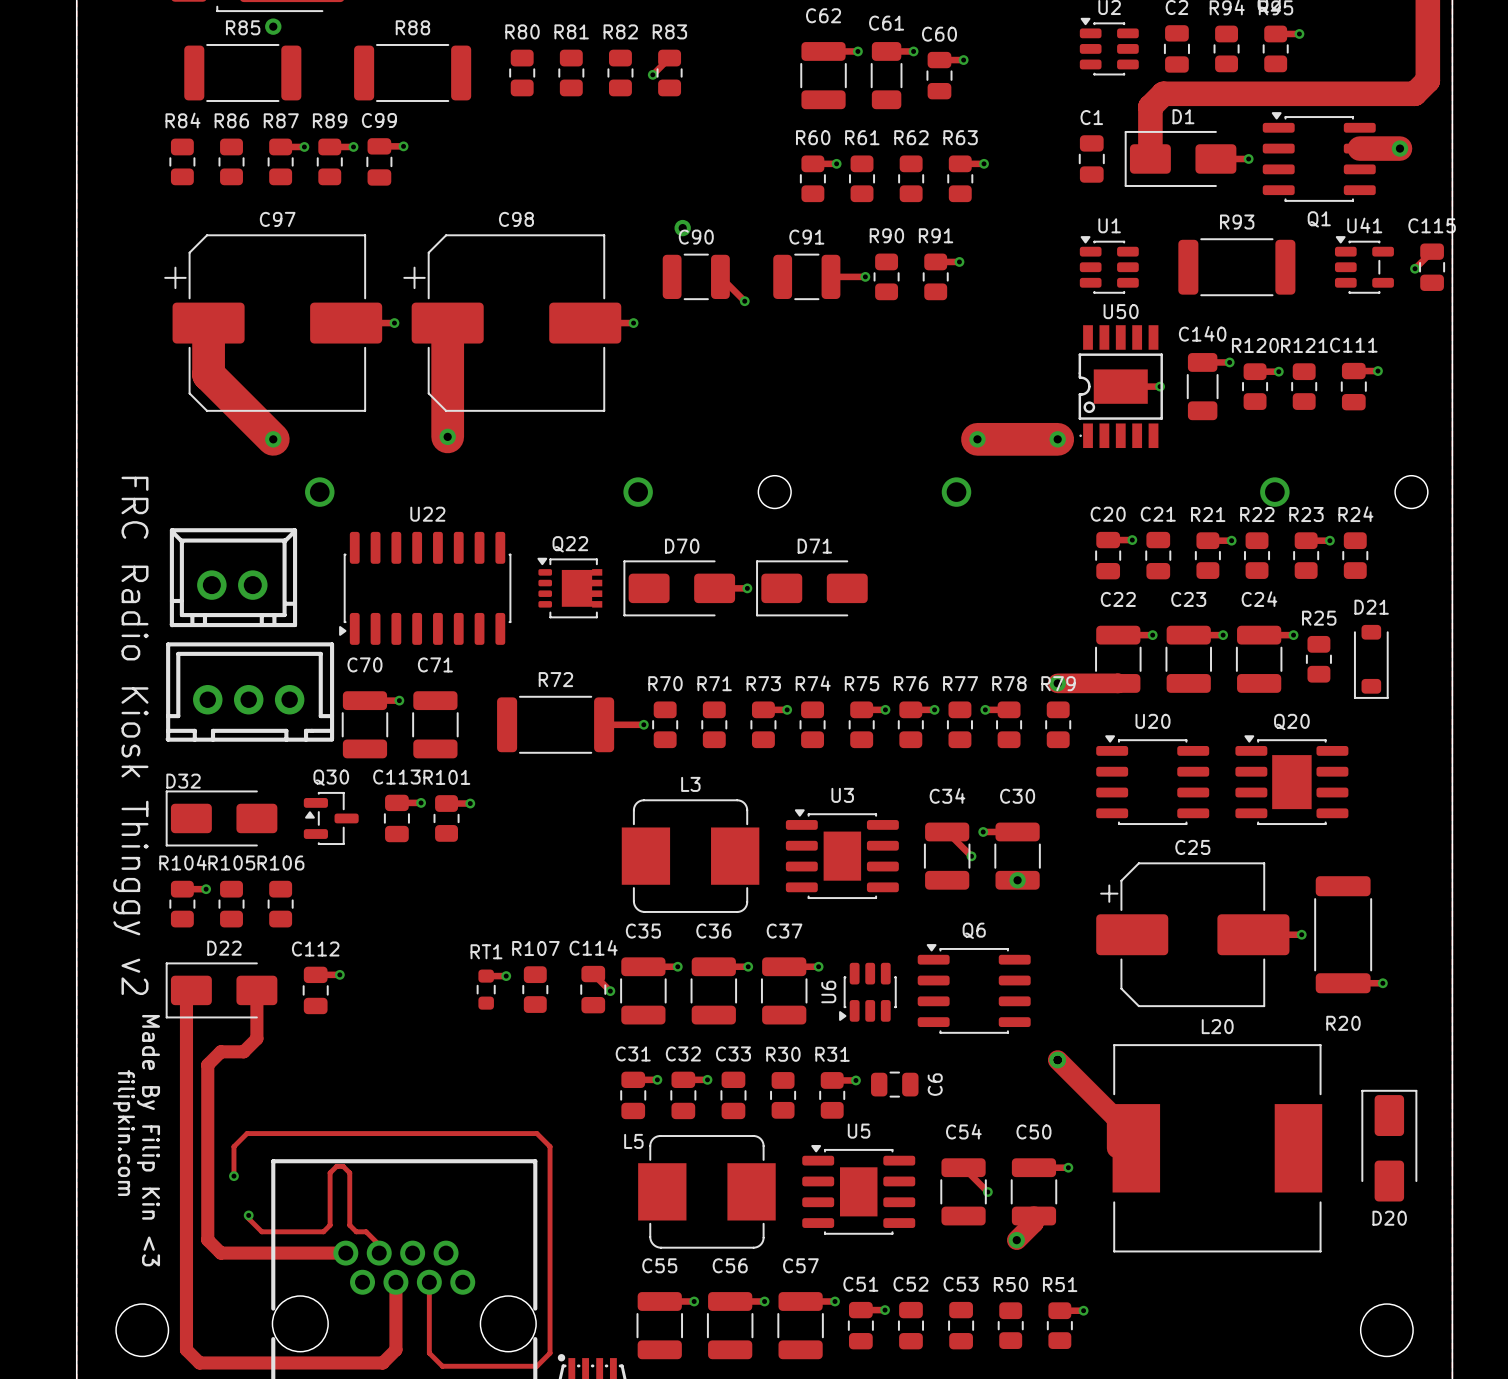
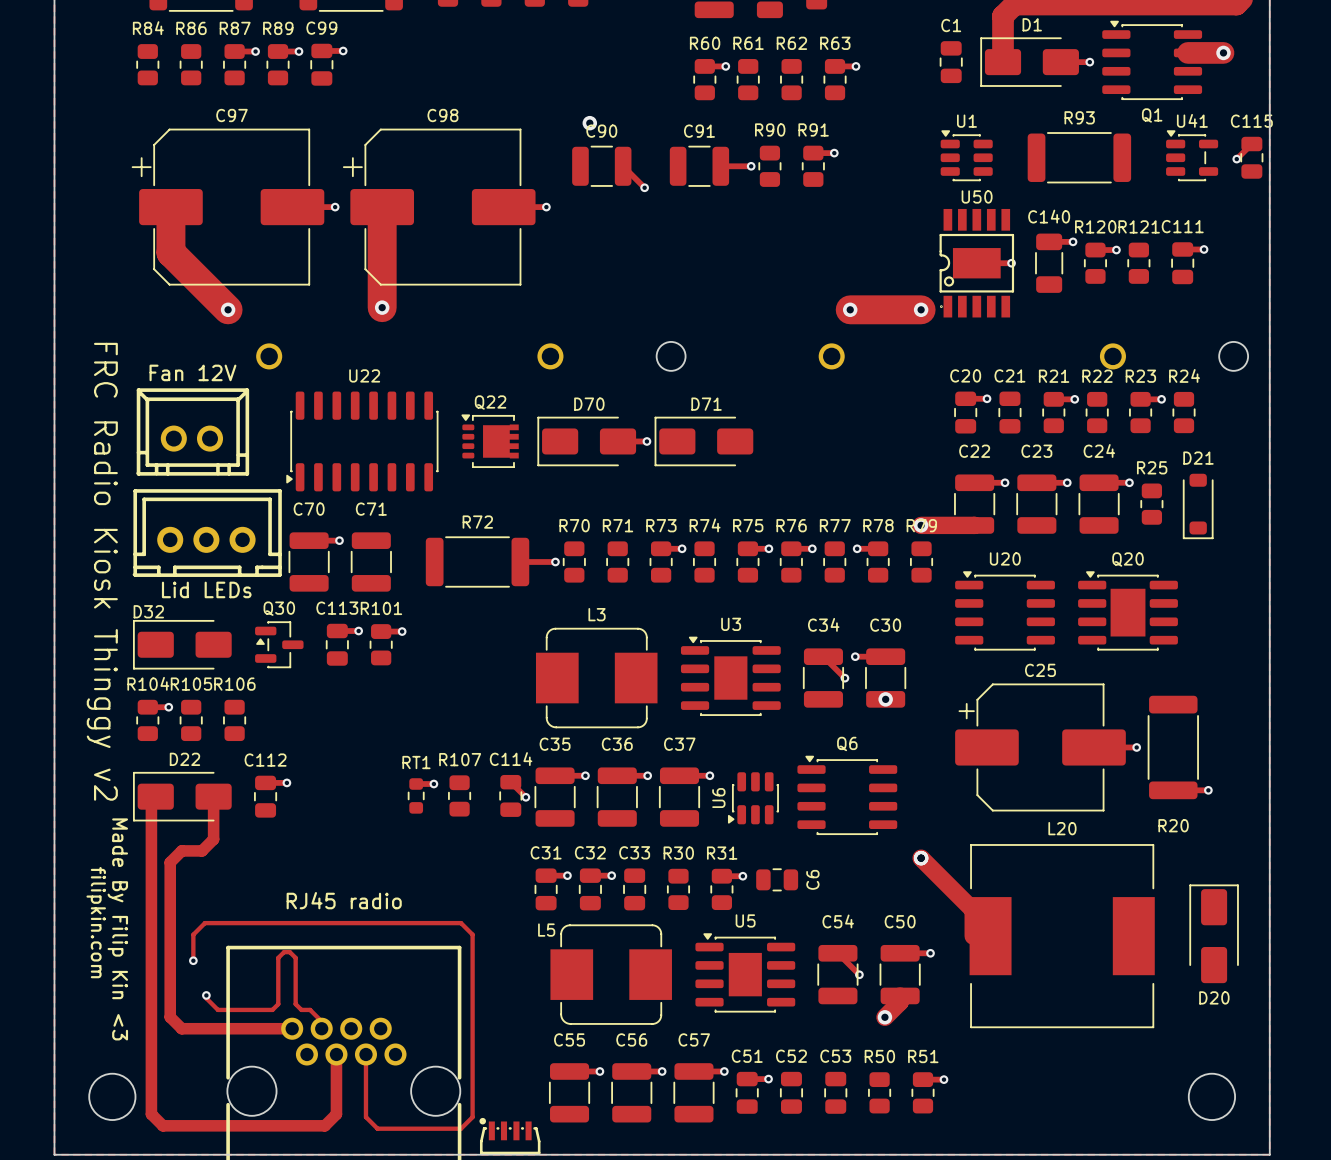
part value: none -> Fan 12V (192, 372)
part value: none -> Lid LEDs (206, 589)
part value: none -> RJ45 radio (344, 900)

